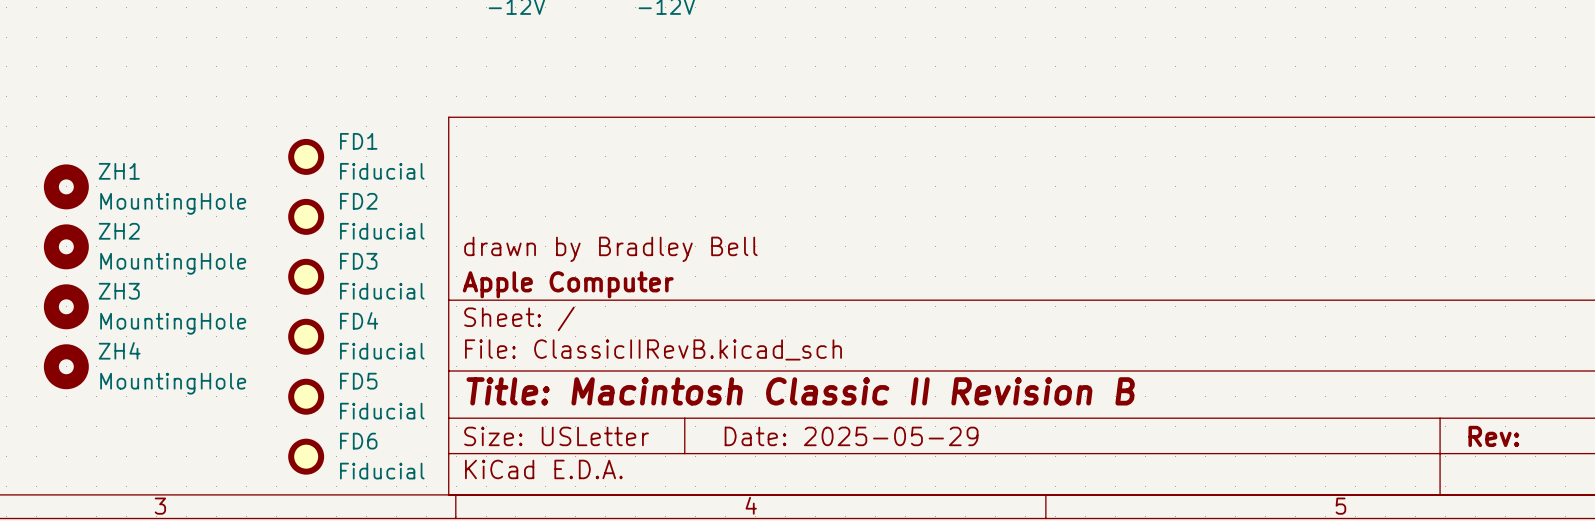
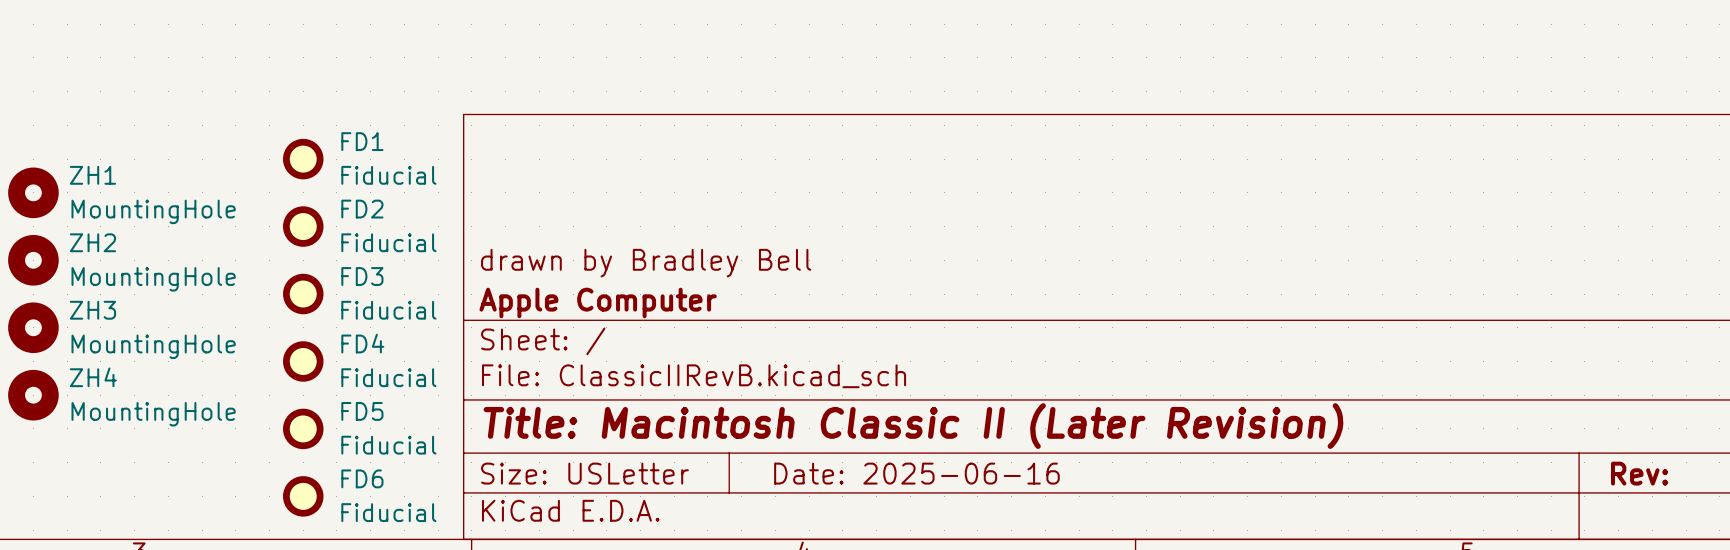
title block: Title: Macintosh Classic II Revision B (800, 391) -> Title: Macintosh Classic II (Later Revision) (913, 426)
title block: Date: 2025-05-29 (851, 436) -> Date: 2025-06-16 (916, 473)

